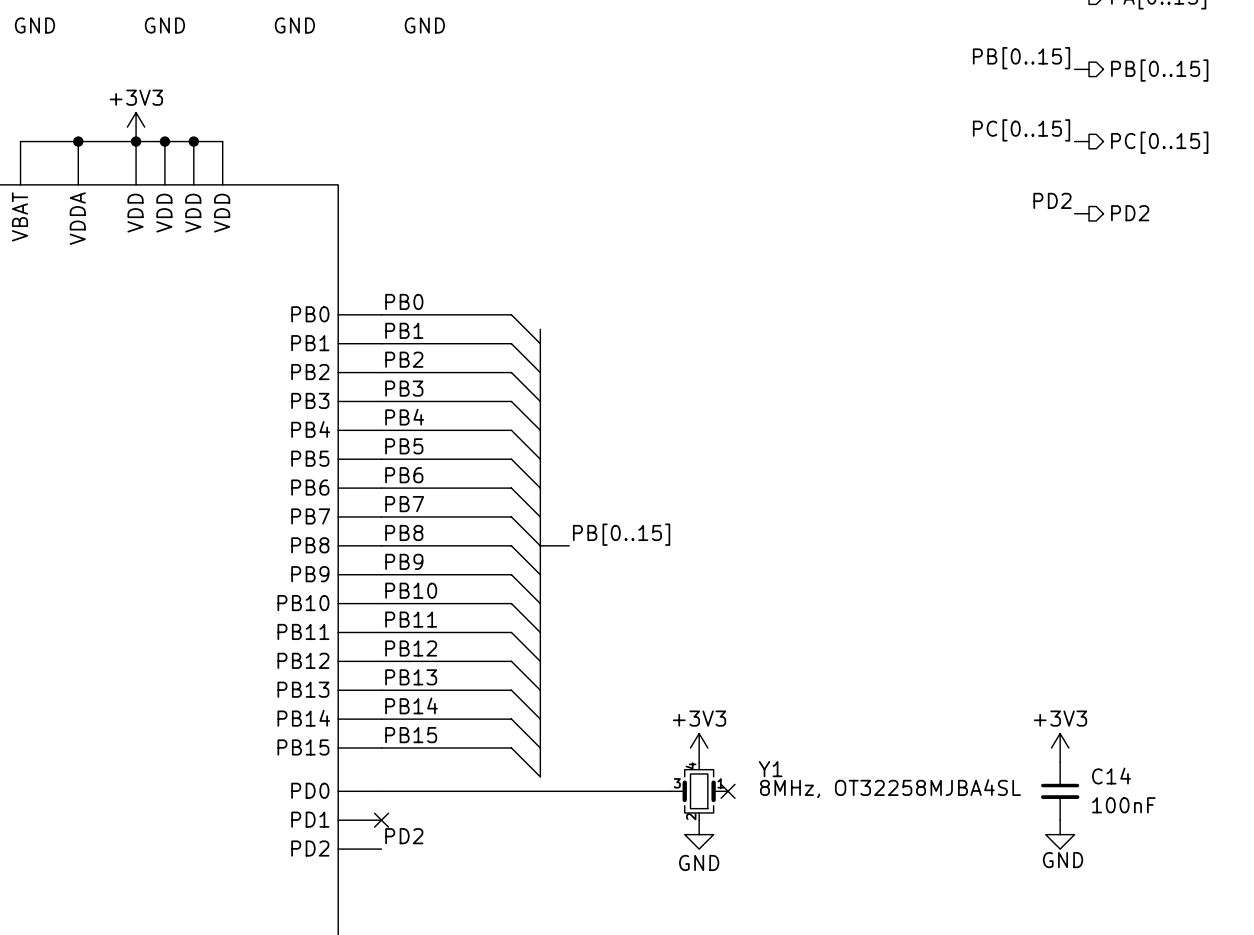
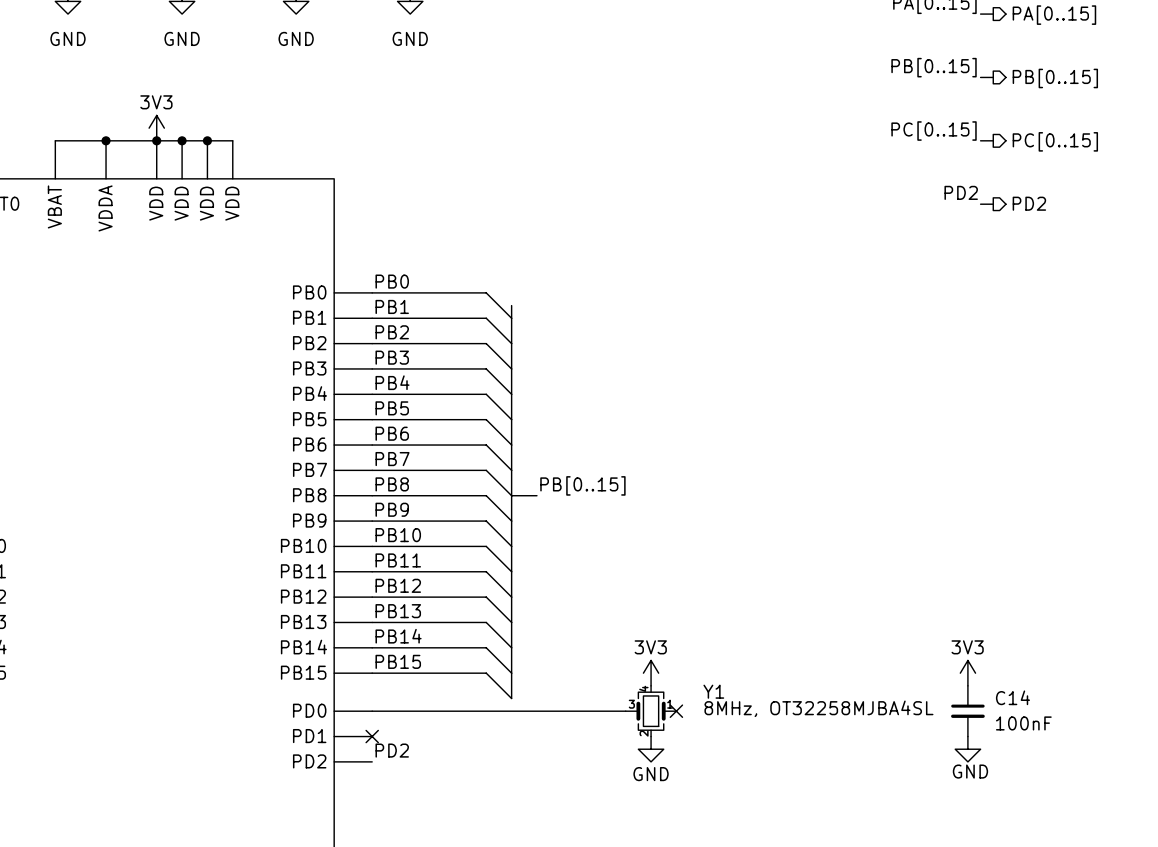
power symbol: +3V3 (136, 127) -> 3V3 (156, 128)
power symbol: +3V3 (699, 748) -> 3V3 (651, 673)
power symbol: +3V3 (1060, 748) -> 3V3 (967, 673)

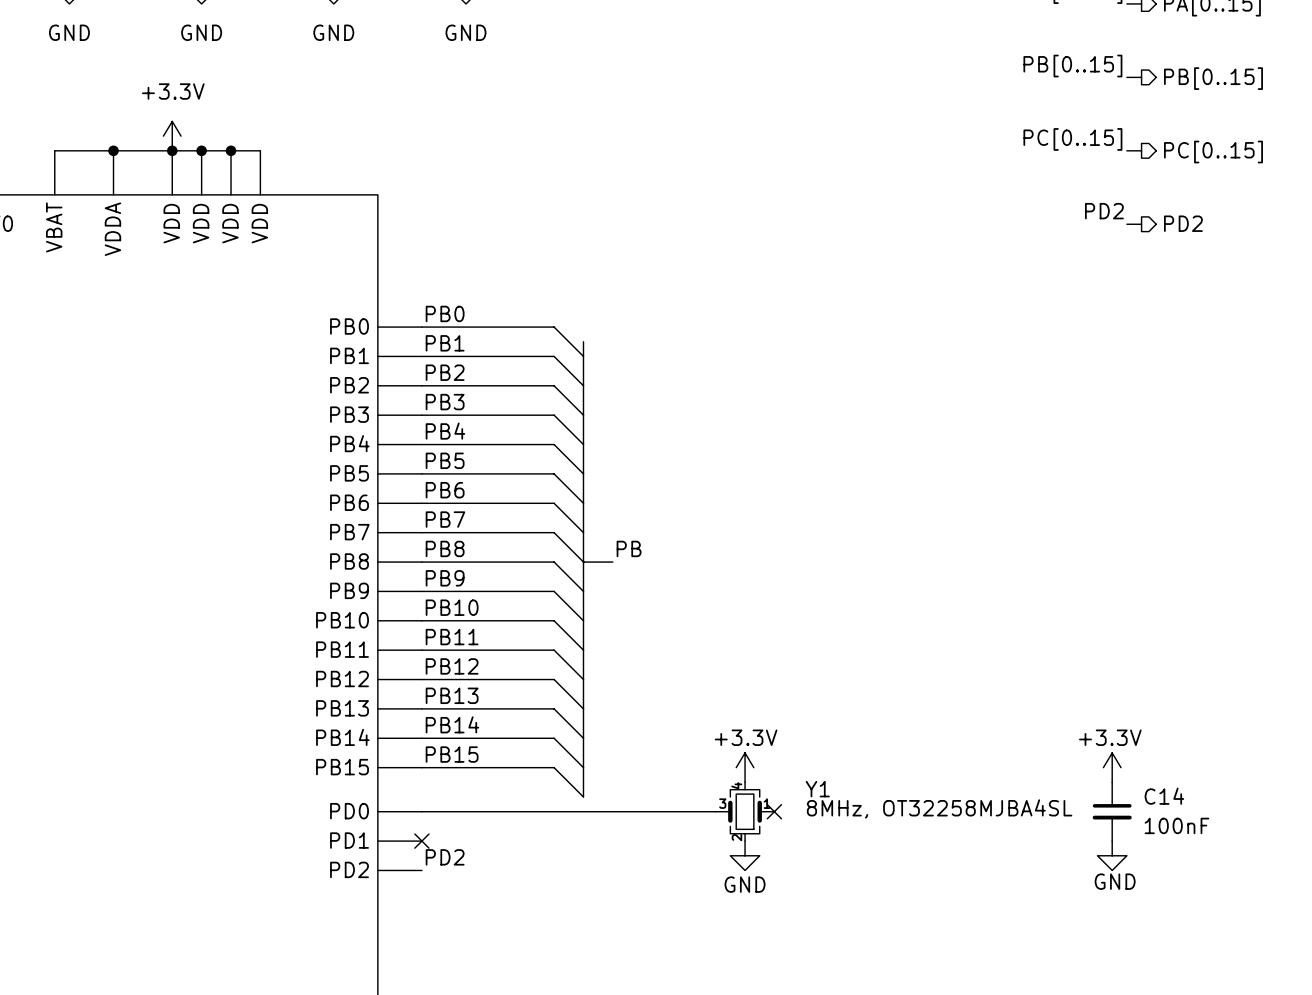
power symbol: 3V3 (156, 128) -> +3.3V (172, 136)
label: PB[0..15] (582, 485) -> PB (629, 548)
power symbol: 3V3 (651, 673) -> +3.3V (745, 767)
power symbol: 3V3 (967, 673) -> +3.3V (1112, 767)

